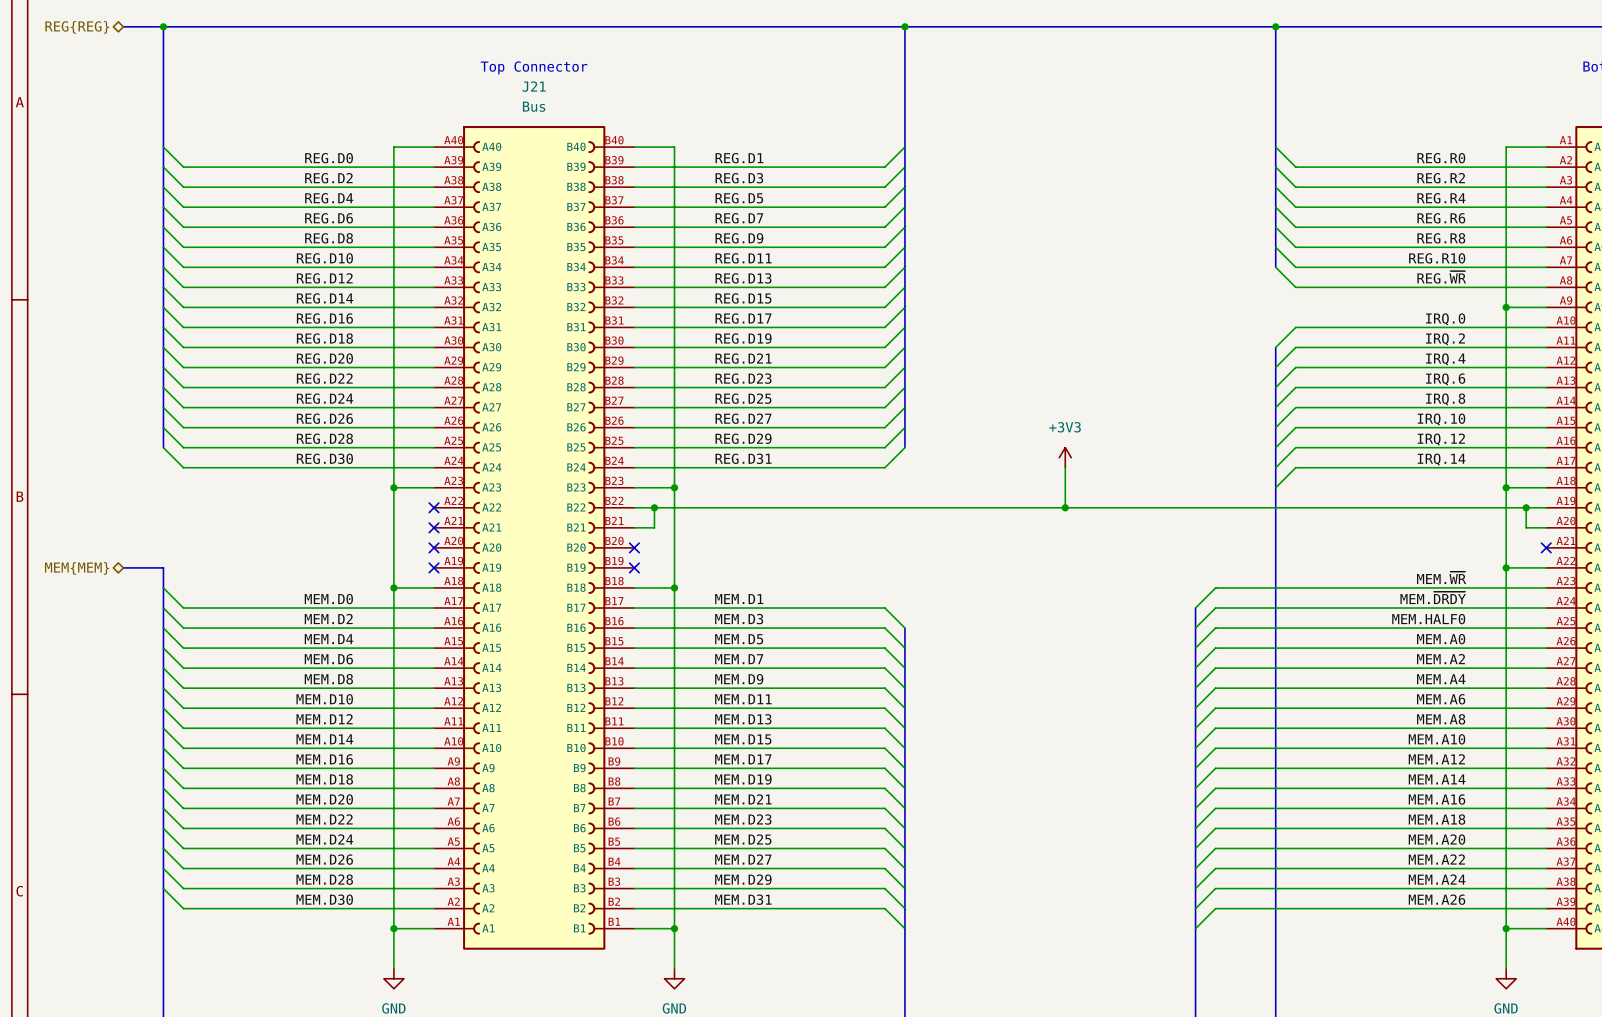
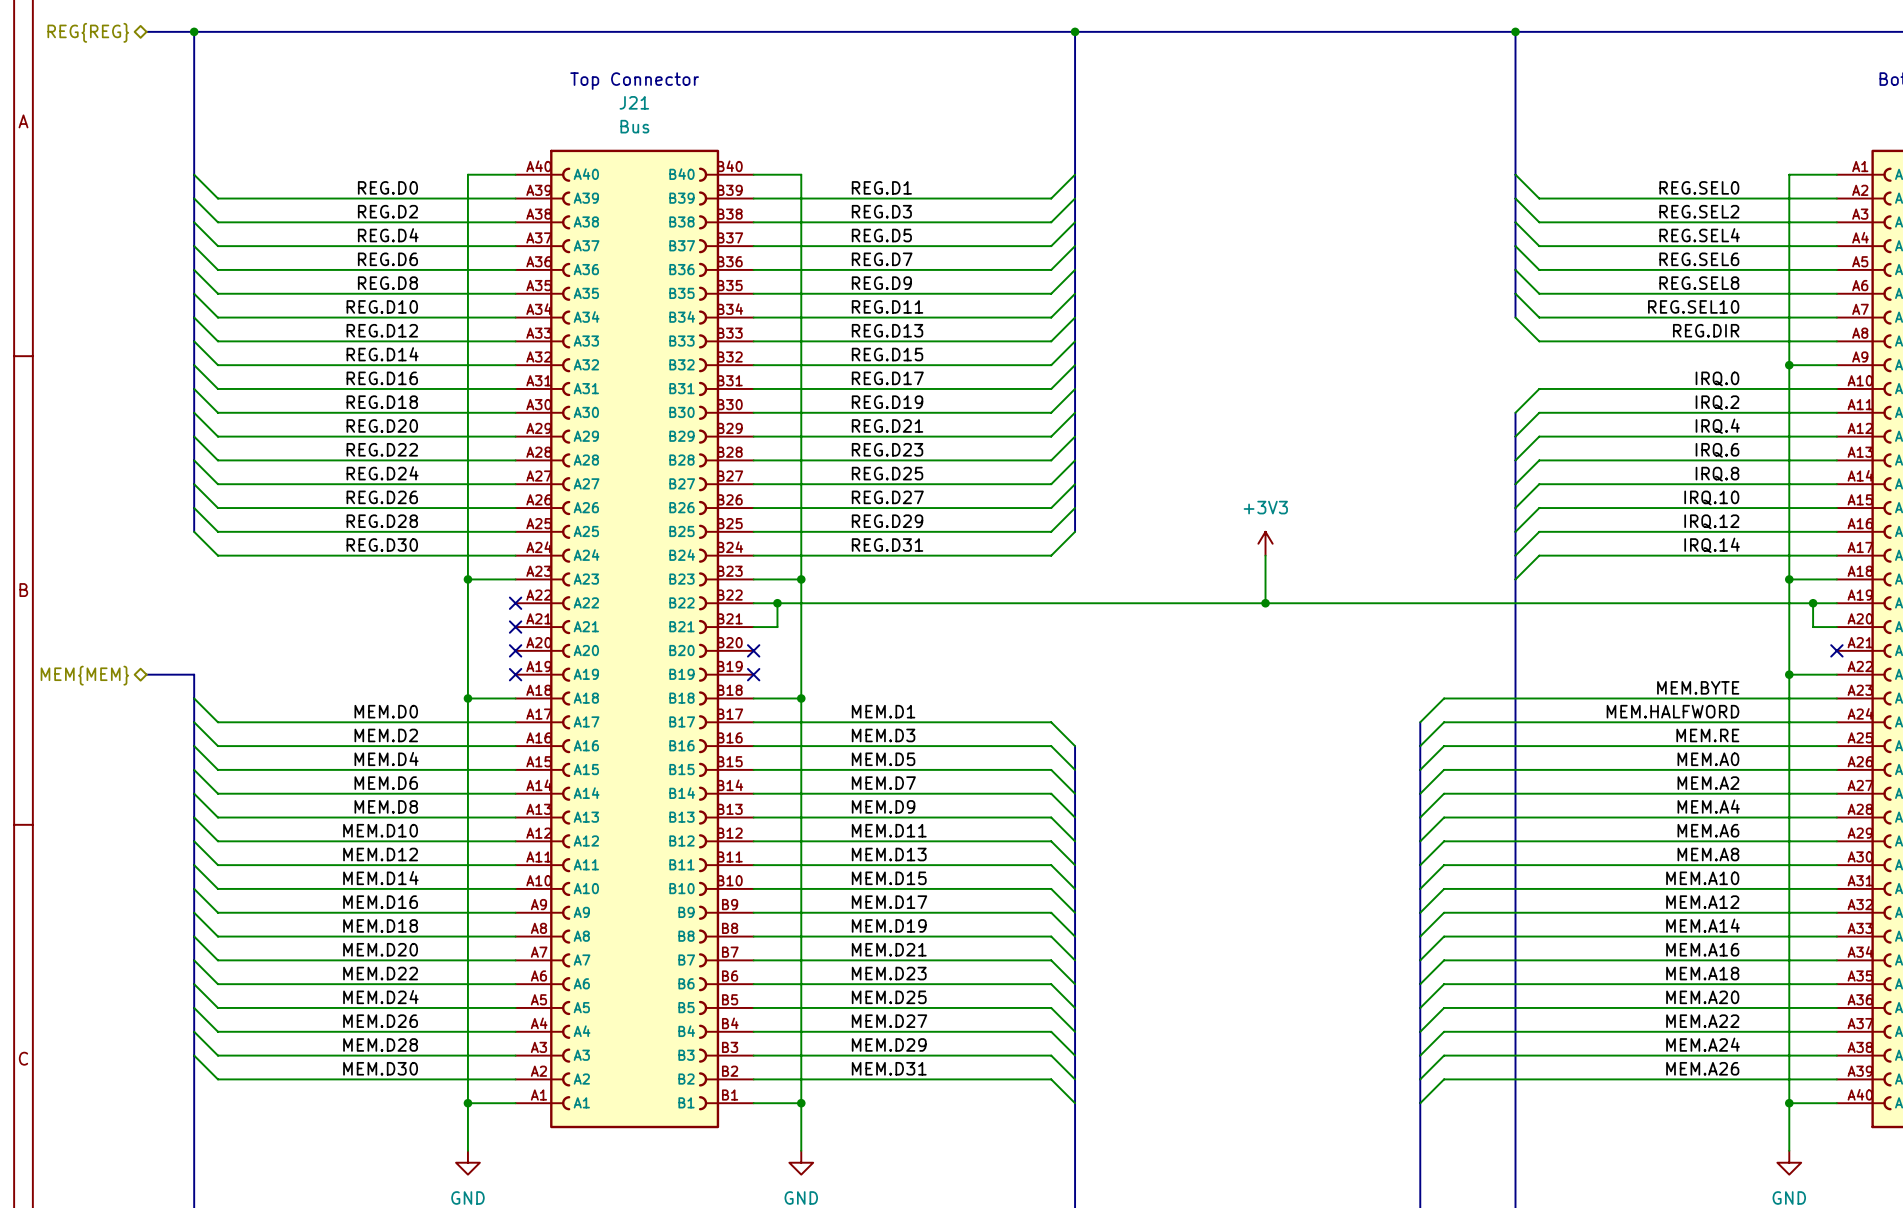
label: REG.R0 (1441, 158) -> REG.SEL0 (1699, 187)
label: REG.R2 (1441, 178) -> REG.SEL2 (1699, 211)
label: REG.R4 (1441, 198) -> REG.SEL4 (1699, 235)
label: REG.R6 (1441, 218) -> REG.SEL6 (1699, 259)
label: REG.R8 (1441, 238) -> REG.SEL8 (1699, 283)
label: REG.R10 (1437, 258) -> REG.SEL10 (1693, 306)
label: REG.~{WR} (1441, 277) -> REG.DIR (1706, 330)
label: MEM.~{WR} (1441, 577) -> MEM.BYTE (1698, 687)
label: MEM.~{DRDY} (1433, 597) -> MEM.HALFWORD (1672, 711)
label: MEM.HALF0 (1428, 619) -> MEM.RE (1707, 735)

